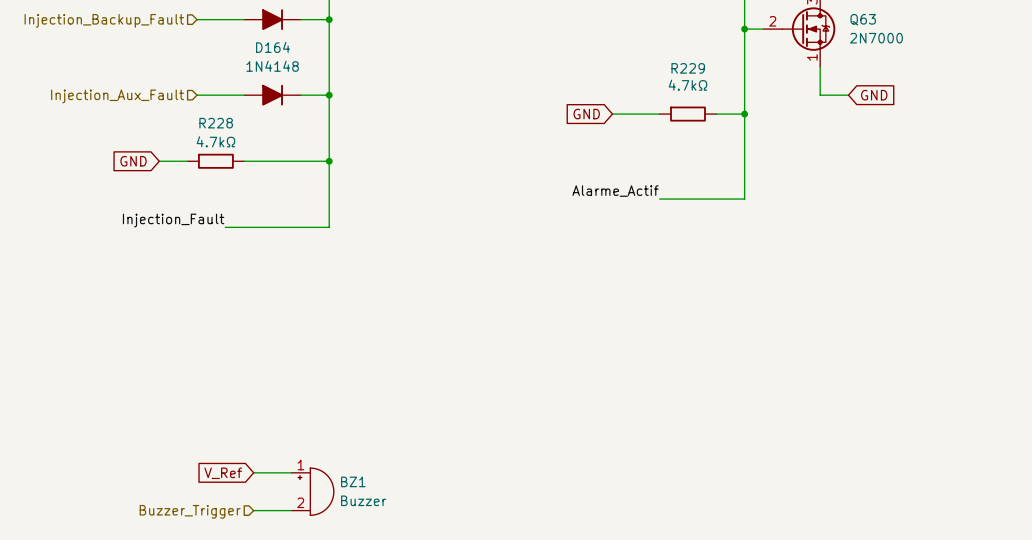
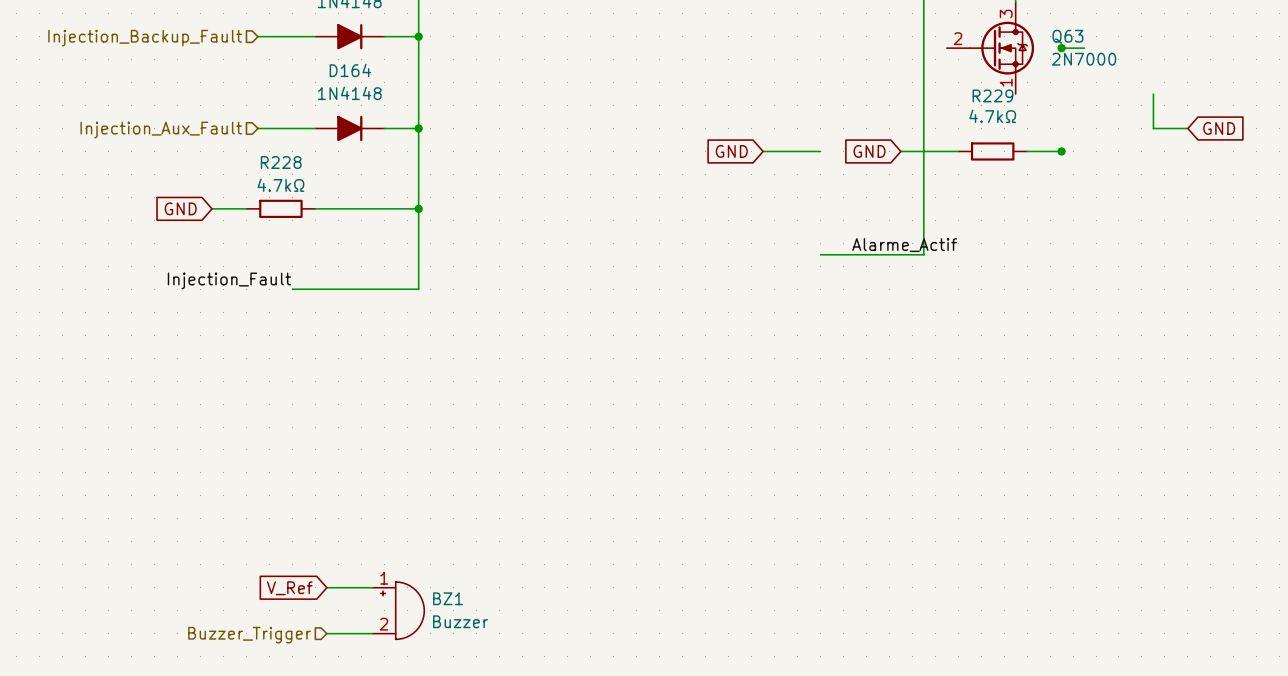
wire: (744, 29) (763, 29) -> (1061, 48) (1084, 48)
junction: (744, 29) -> none
junction: none -> (1061, 48)
wire: (820, 66) (820, 95) (848, 95) -> (1153, 94) (1153, 128) (1187, 128)
global label: GND (874, 95) -> none
global label: none -> GND (1219, 128)
R229 position: (687, 114) -> (992, 151)
global label: none -> GND (869, 151)
wire: (716, 114) (725, 114) -> none
wire: none -> (923, 151) (958, 151)
junction: (744, 114) -> none
wire: none -> (1027, 151) (1061, 151)
junction: none -> (1061, 151)
label position: Alarme_Actif (615, 191) -> Alarme_Actif (904, 245)

